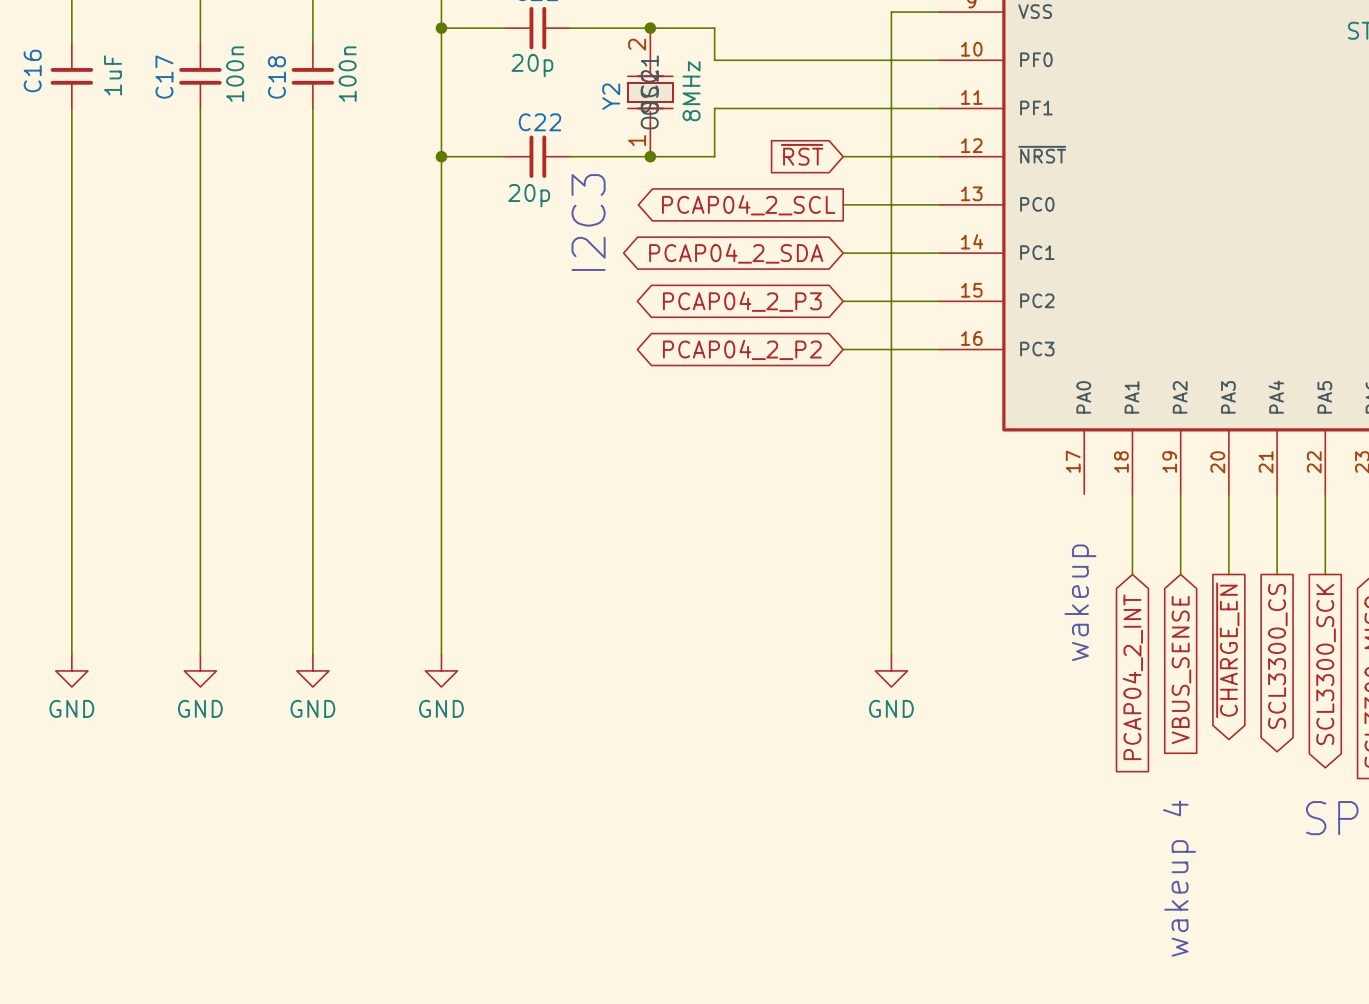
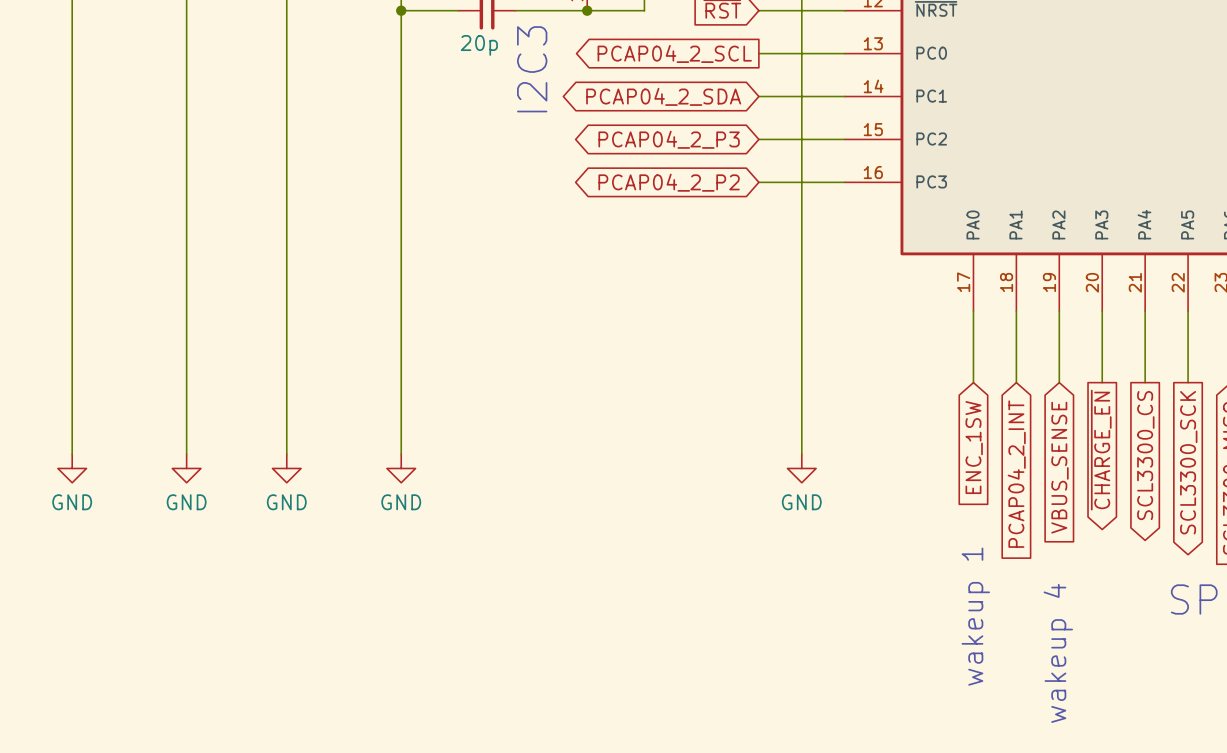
wire: none -> (973, 311) (973, 382)
text: wakeup (1080, 602) -> none
global label: none -> ENC_1SW (974, 447)
text: none -> wakeup 1 (975, 616)

